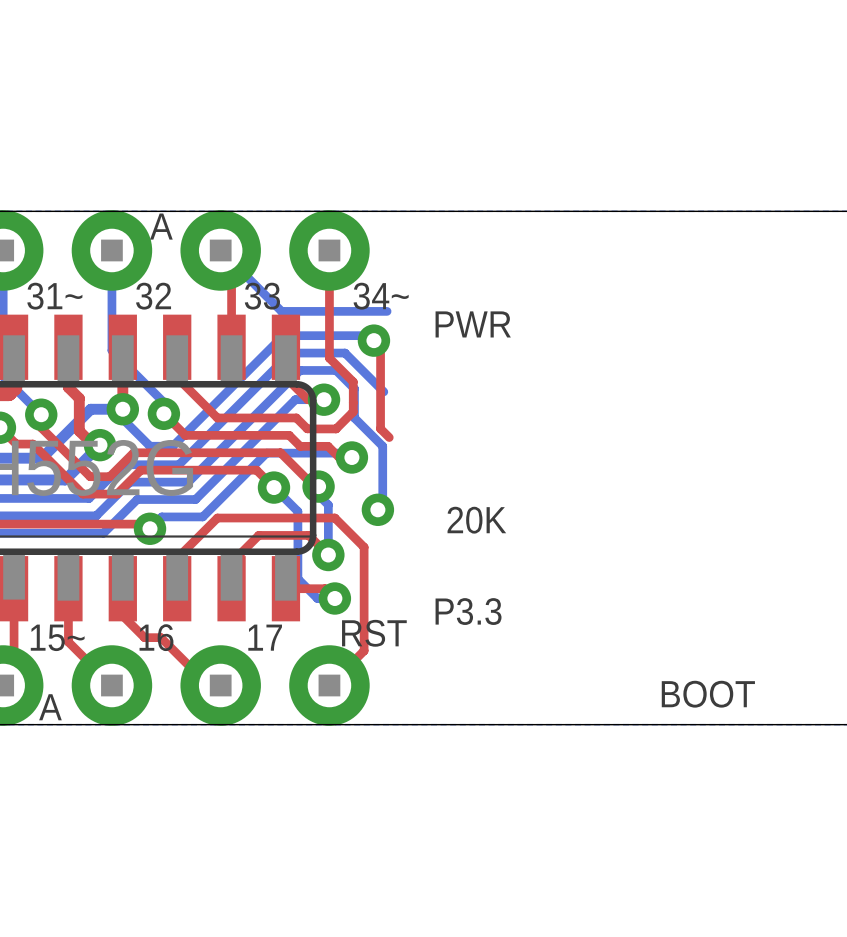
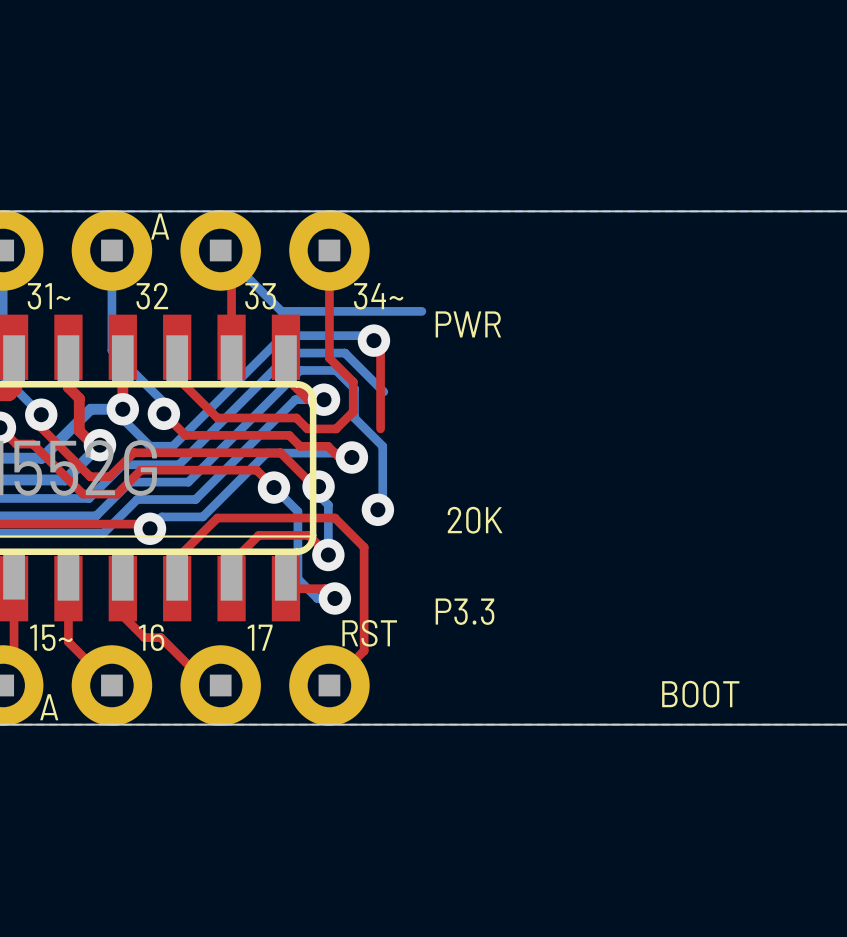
bottom track: none -> (387, 311) (421, 311)
top track: (380, 428) (389, 437) -> none

